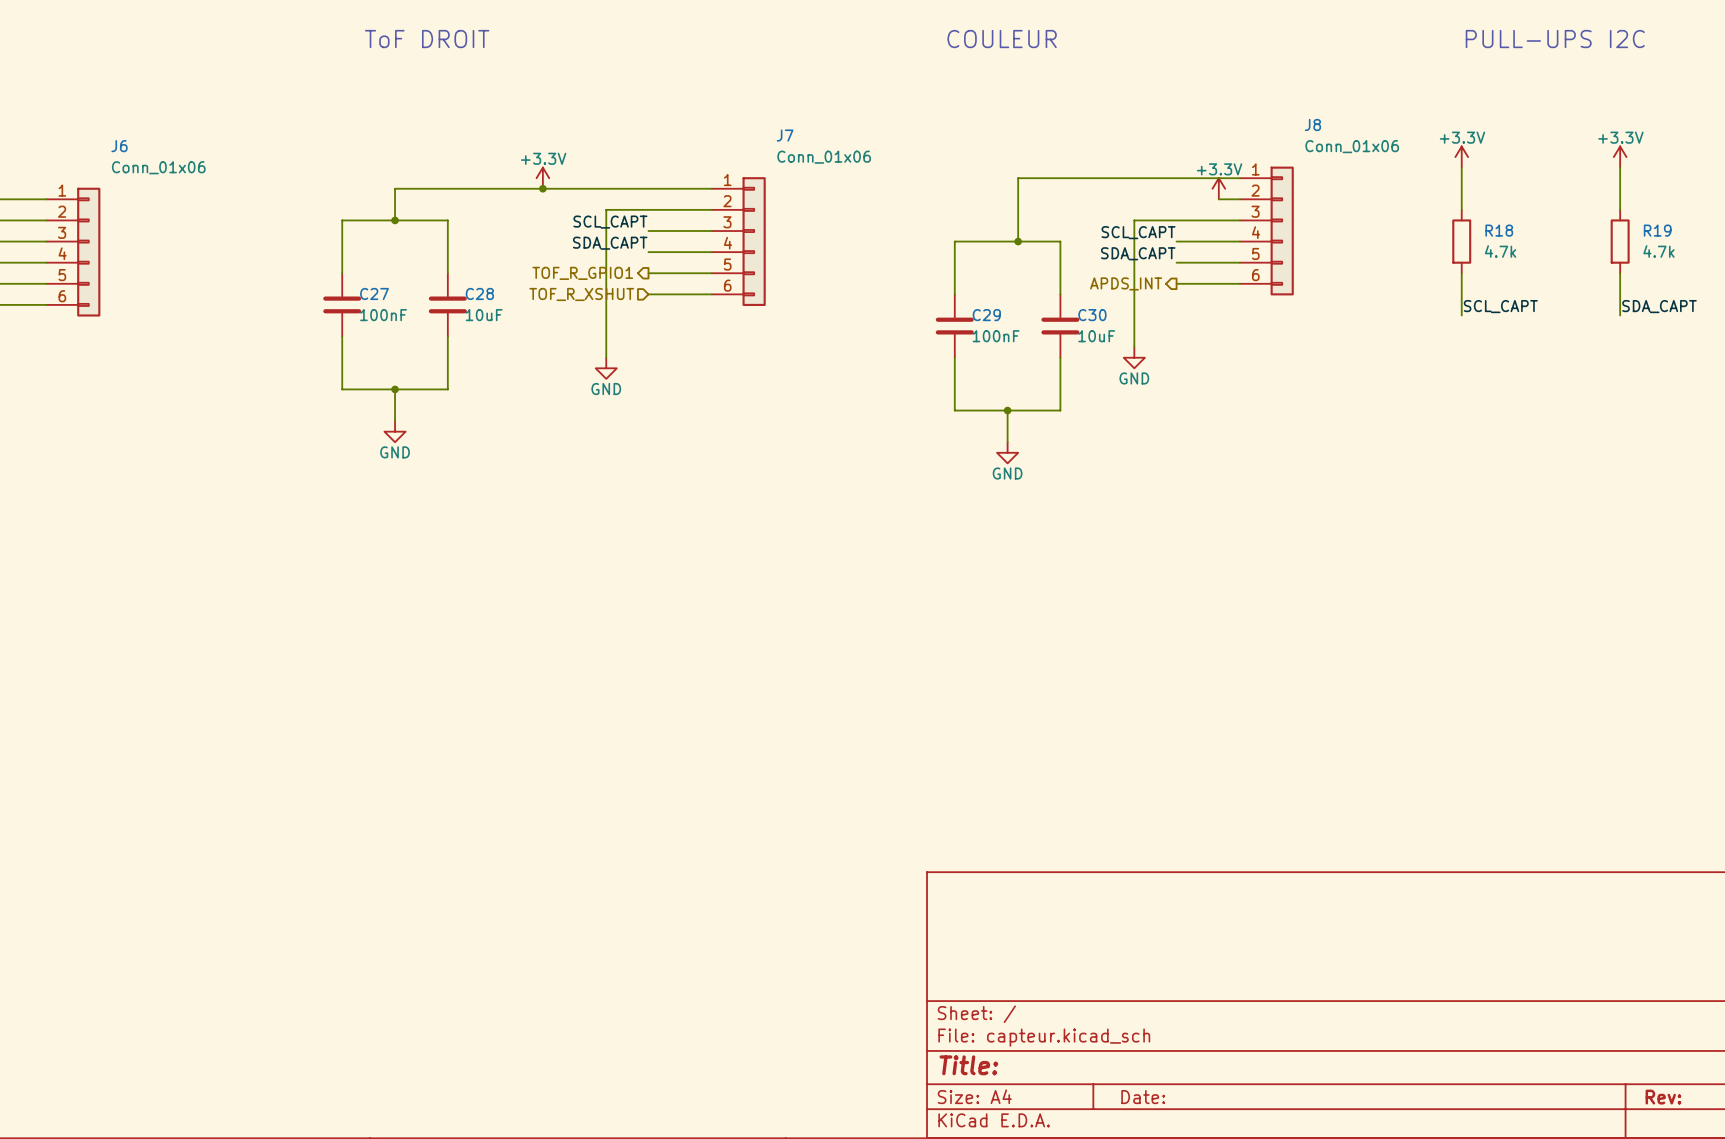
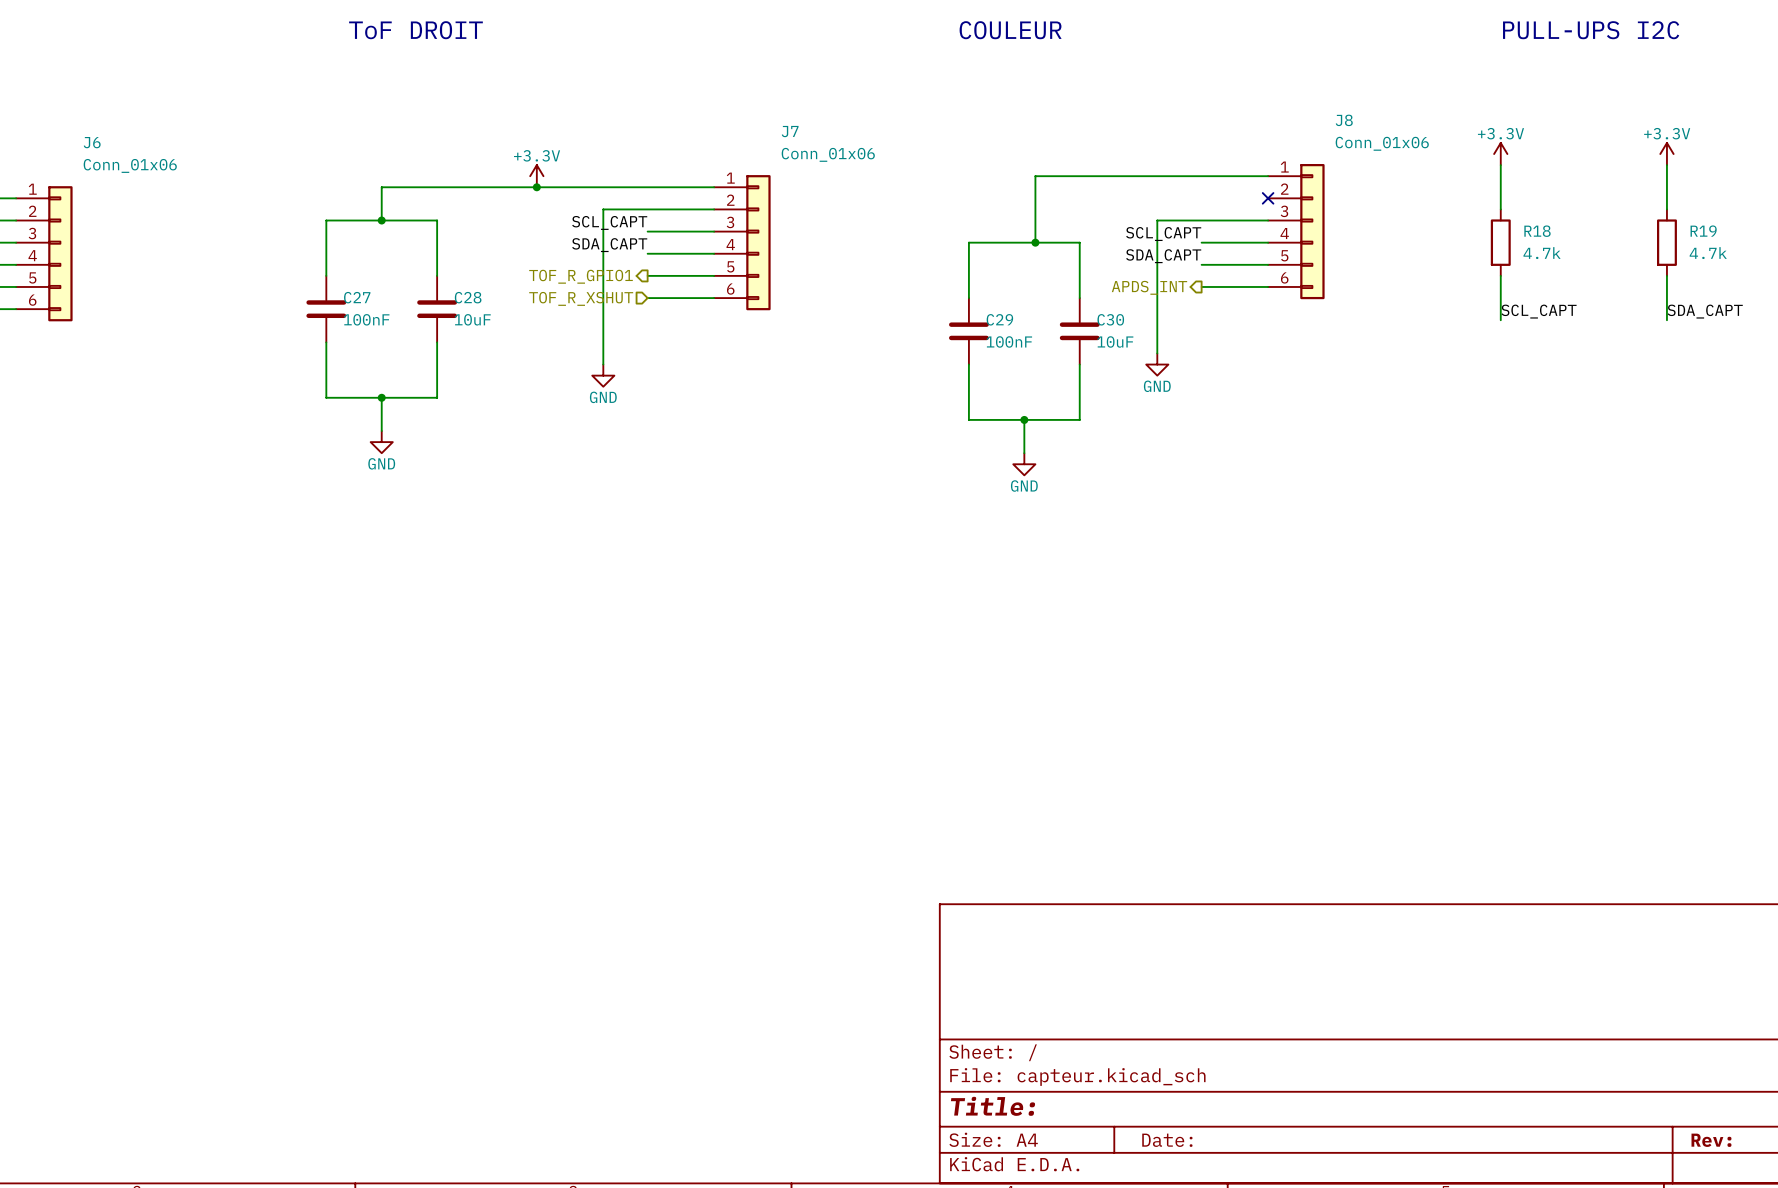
power symbol: +3.3V (1218, 188) -> none
wire: (1218, 199) (1239, 199) -> none
no-connect mark: none -> (1268, 198)

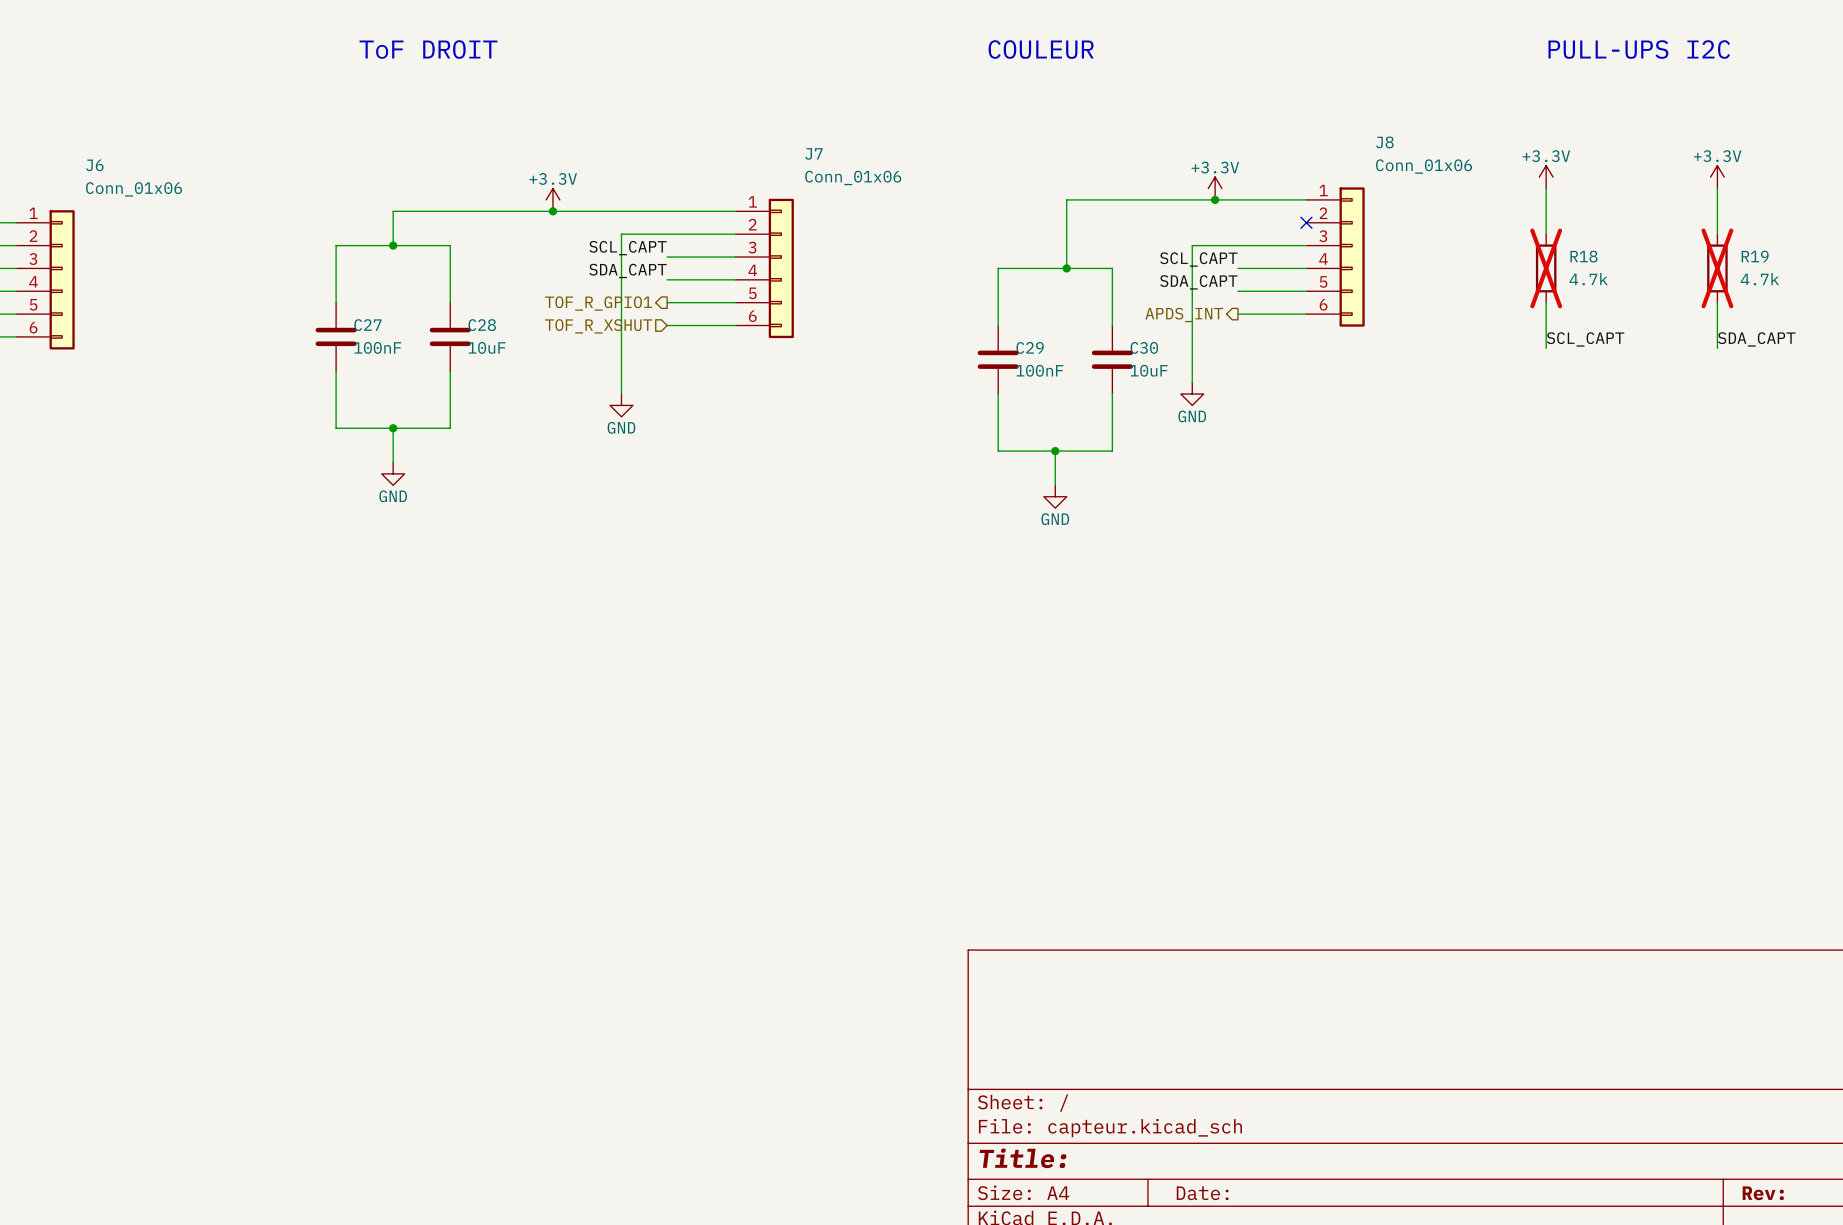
power symbol: none -> +3.3V (1215, 188)
junction: none -> (1215, 199)
R18 do-not-place cross: none -> (1546, 268)
R19 do-not-place cross: none -> (1717, 268)

